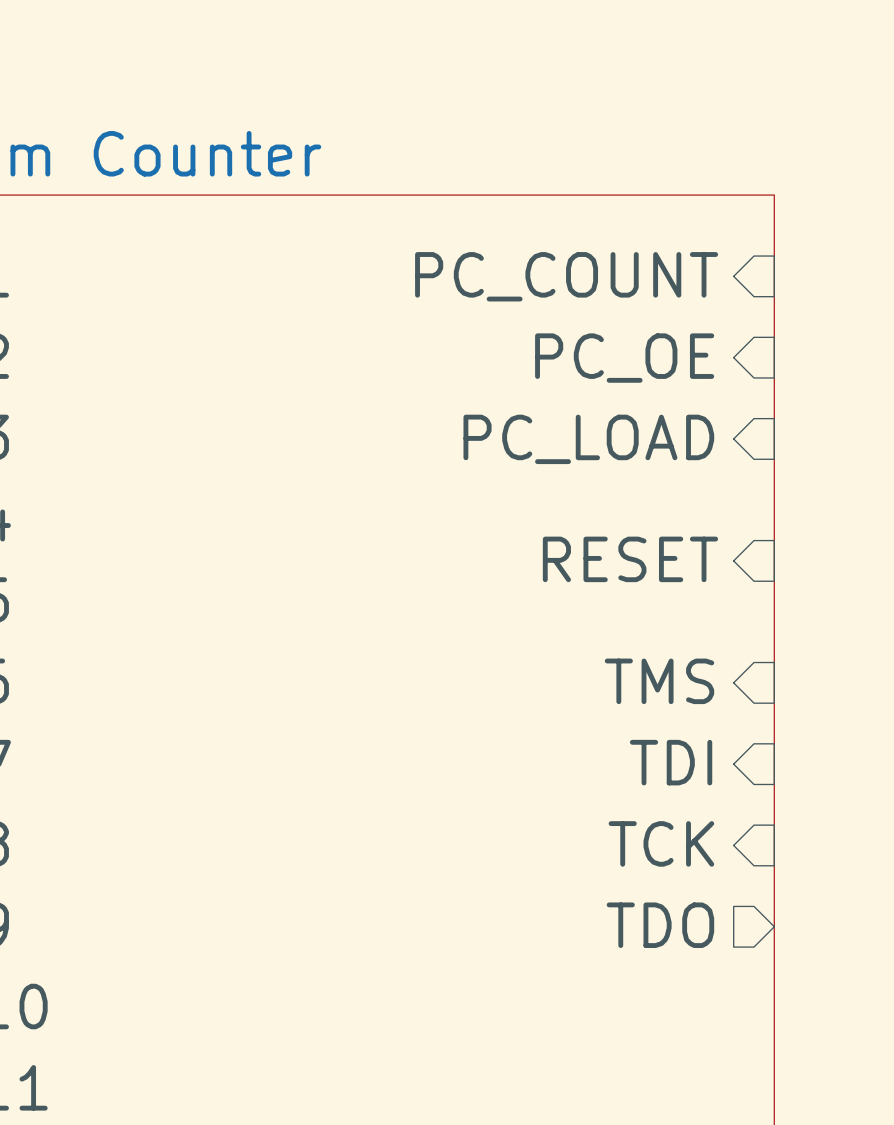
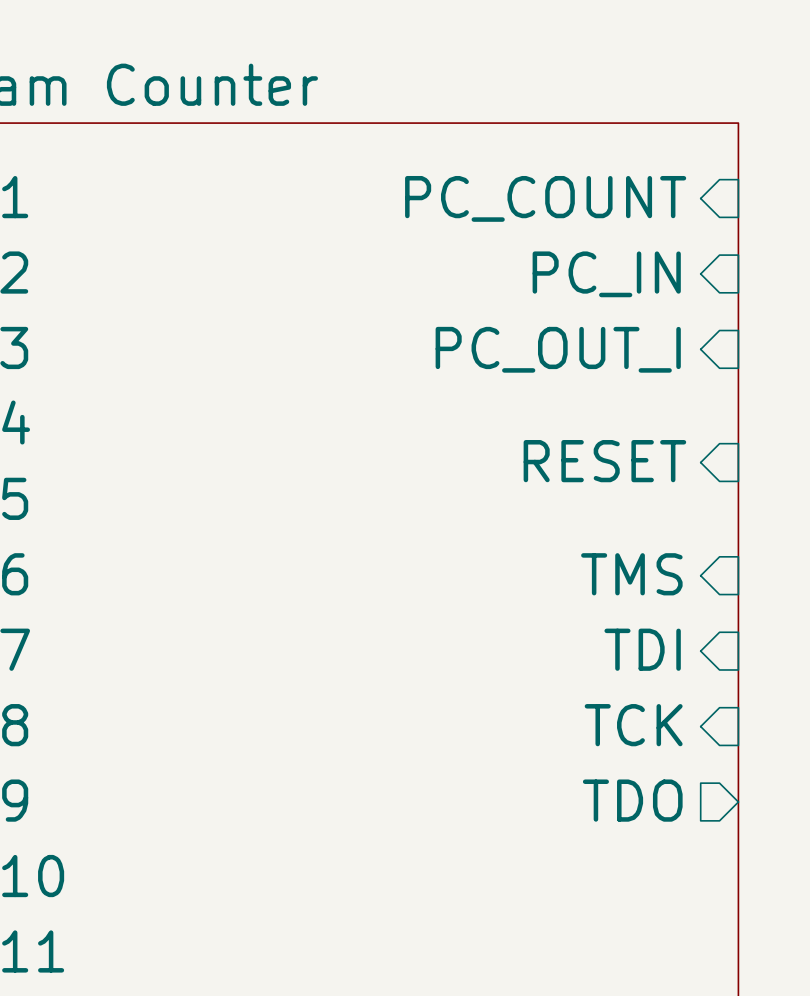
sheet pin: PC_OE (624, 358) -> PC_IN (606, 274)
sheet pin: PC_LOAD (588, 439) -> PC_OUT_I (558, 349)

